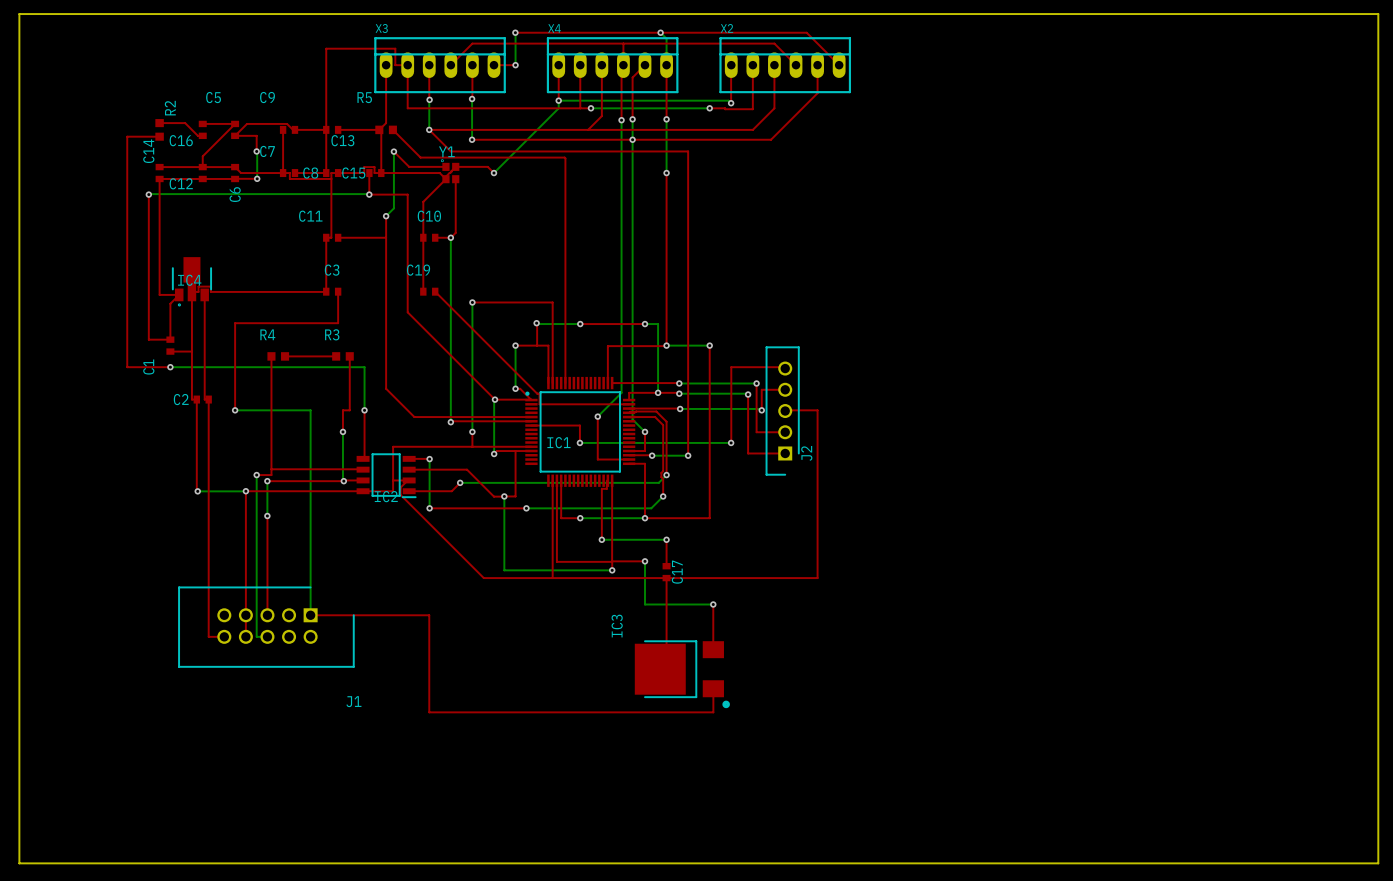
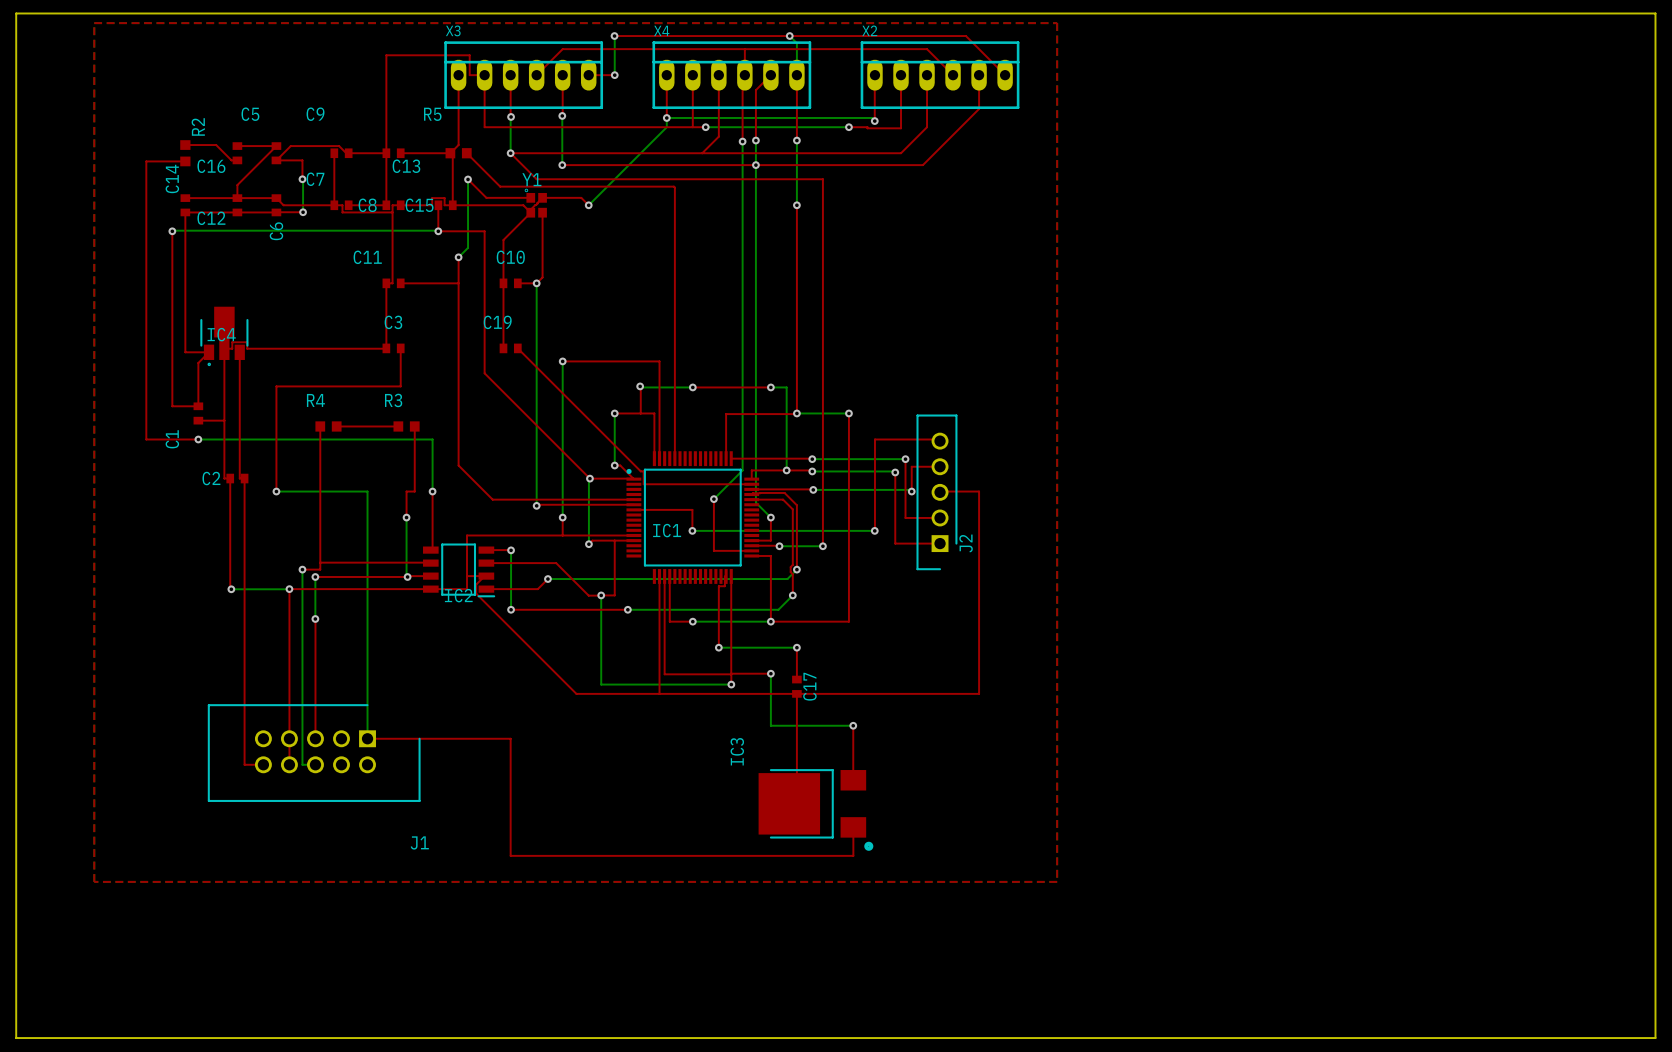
top zone outline: none -> (94, 23) (1057, 23) (1057, 881) (94, 881) (94, 23)

